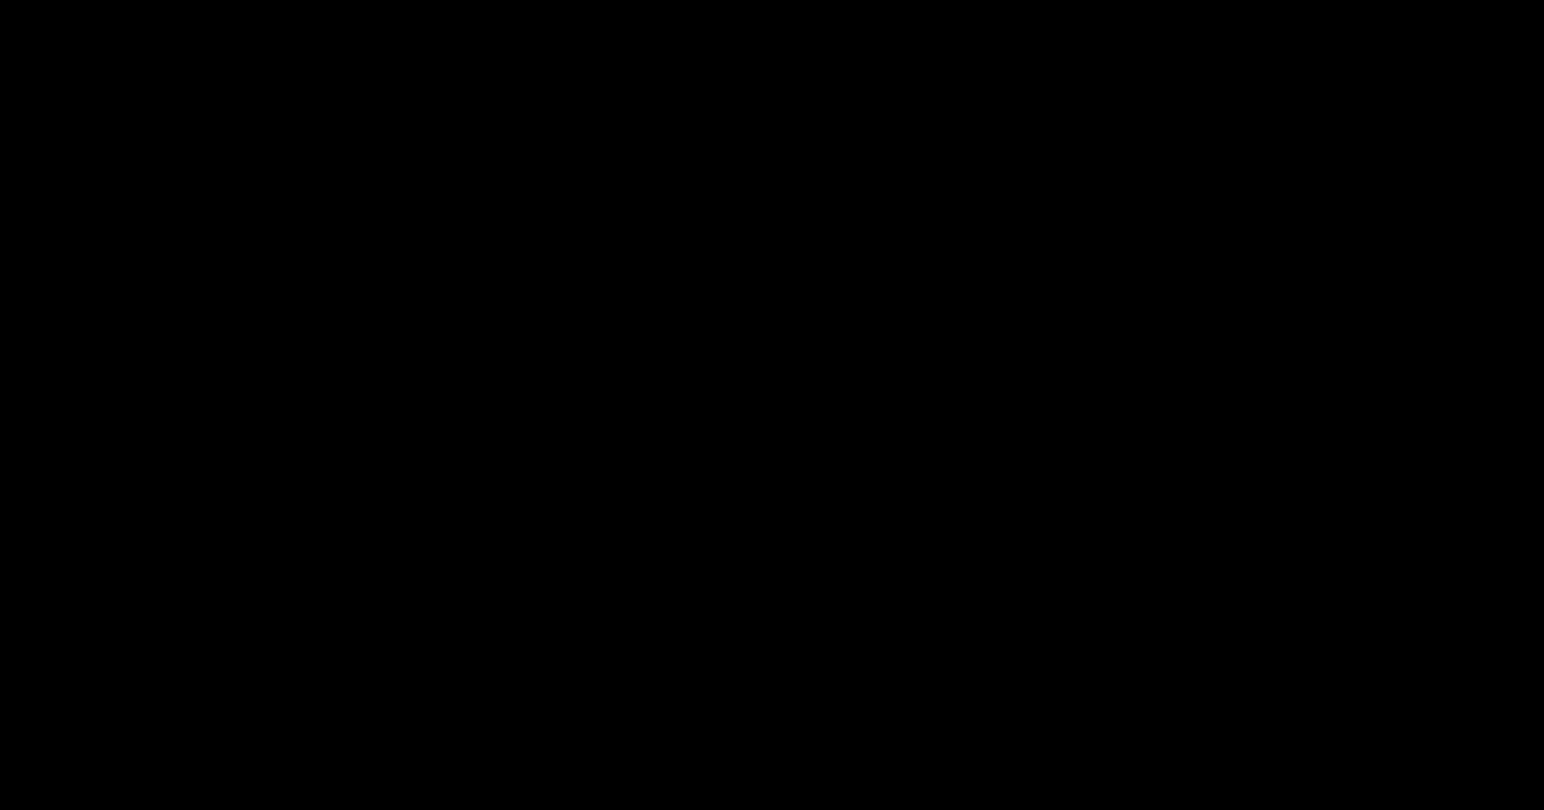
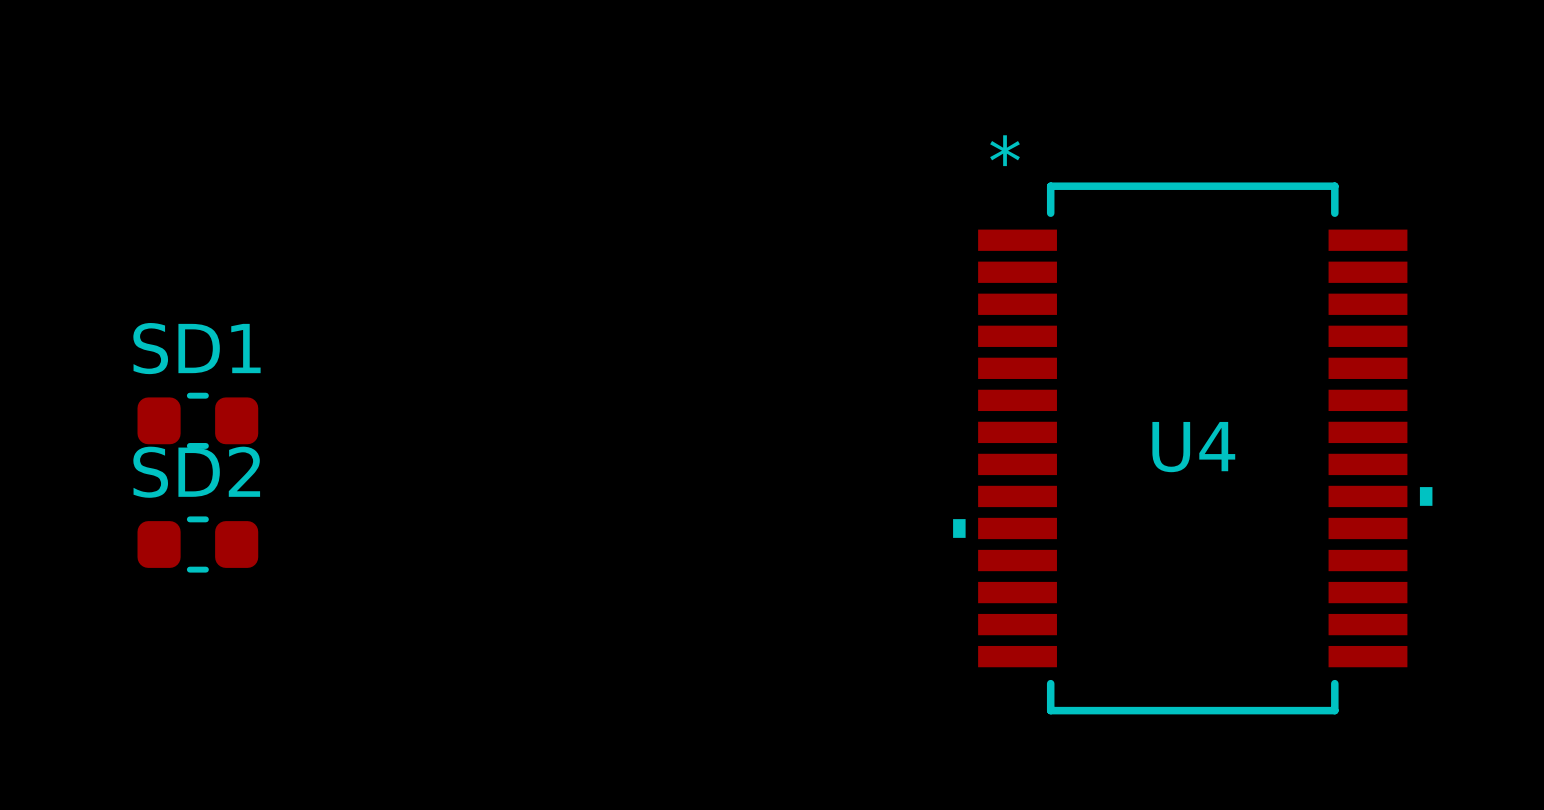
SD1: none -> (197, 420)
U4: none -> (1192, 448)
SD2: none -> (197, 544)

